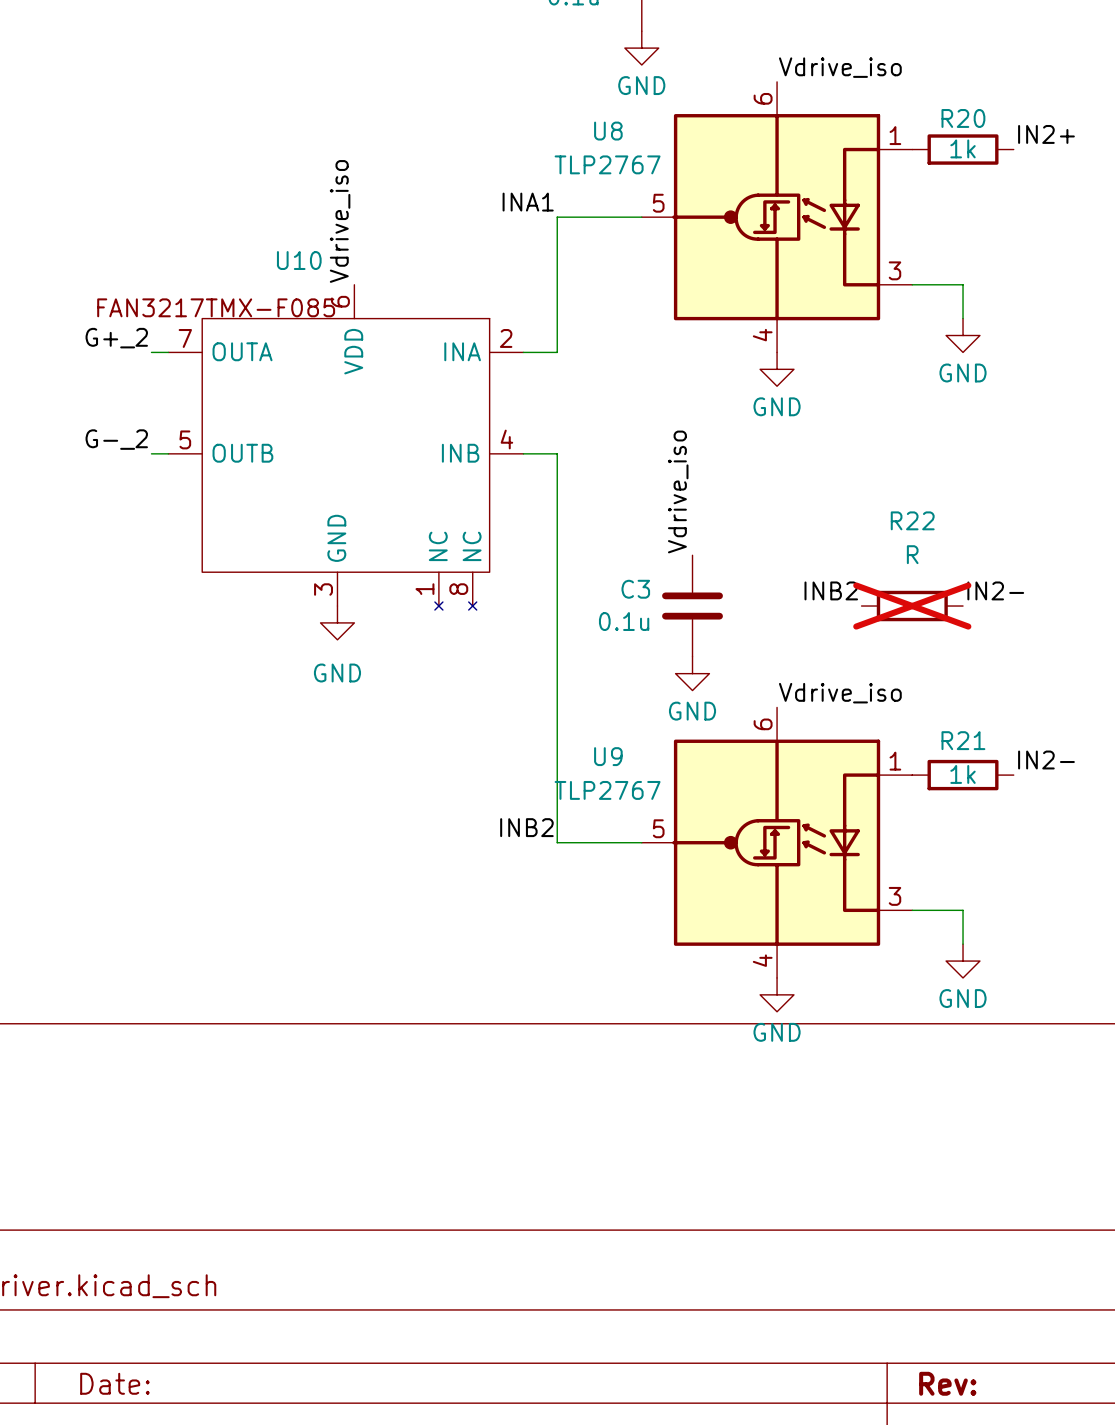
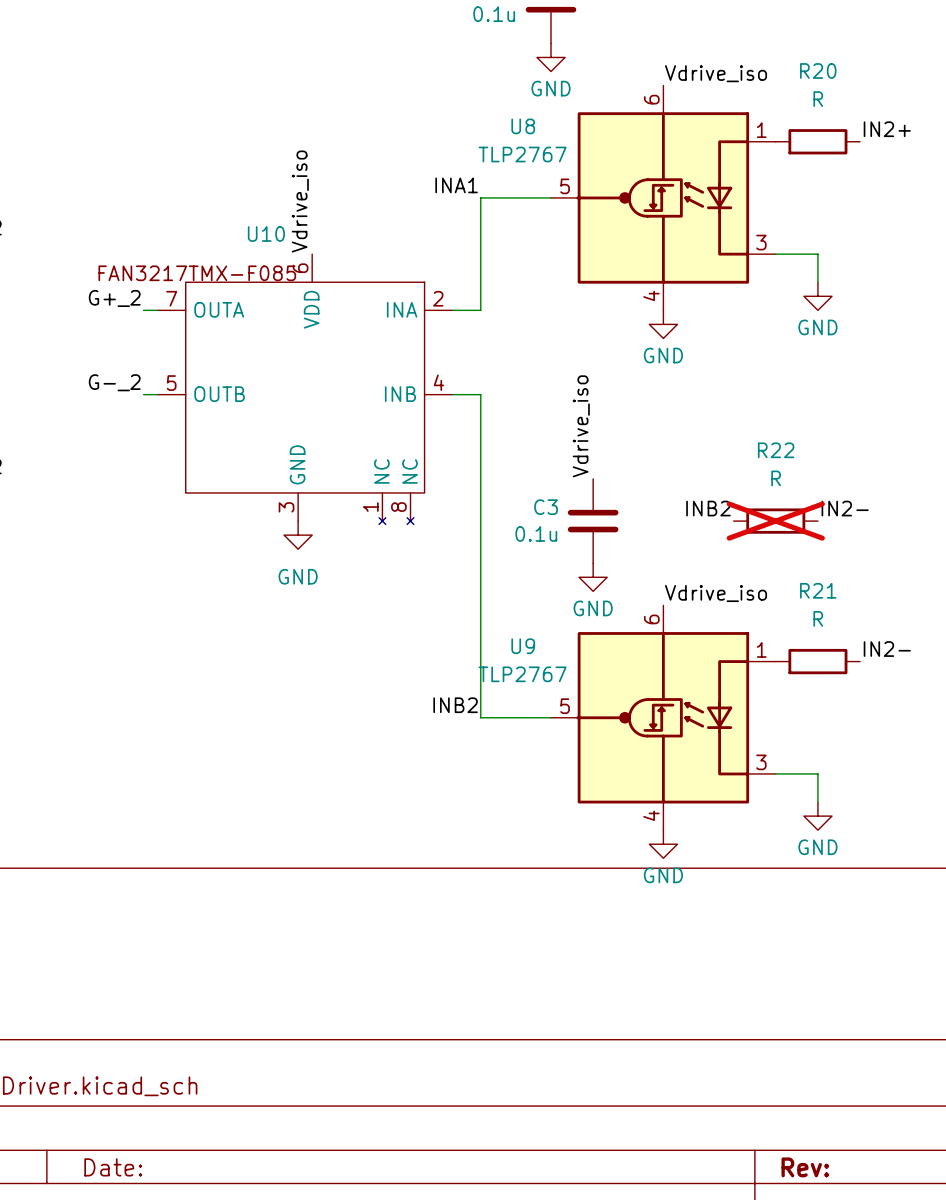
R20 name position: R20 (963, 118) -> R20 (818, 70)
R20 value: 1k (963, 148) -> R (818, 99)
R21 name position: R21 (963, 740) -> R21 (818, 590)
R21 value: 1k (963, 774) -> R (818, 618)

